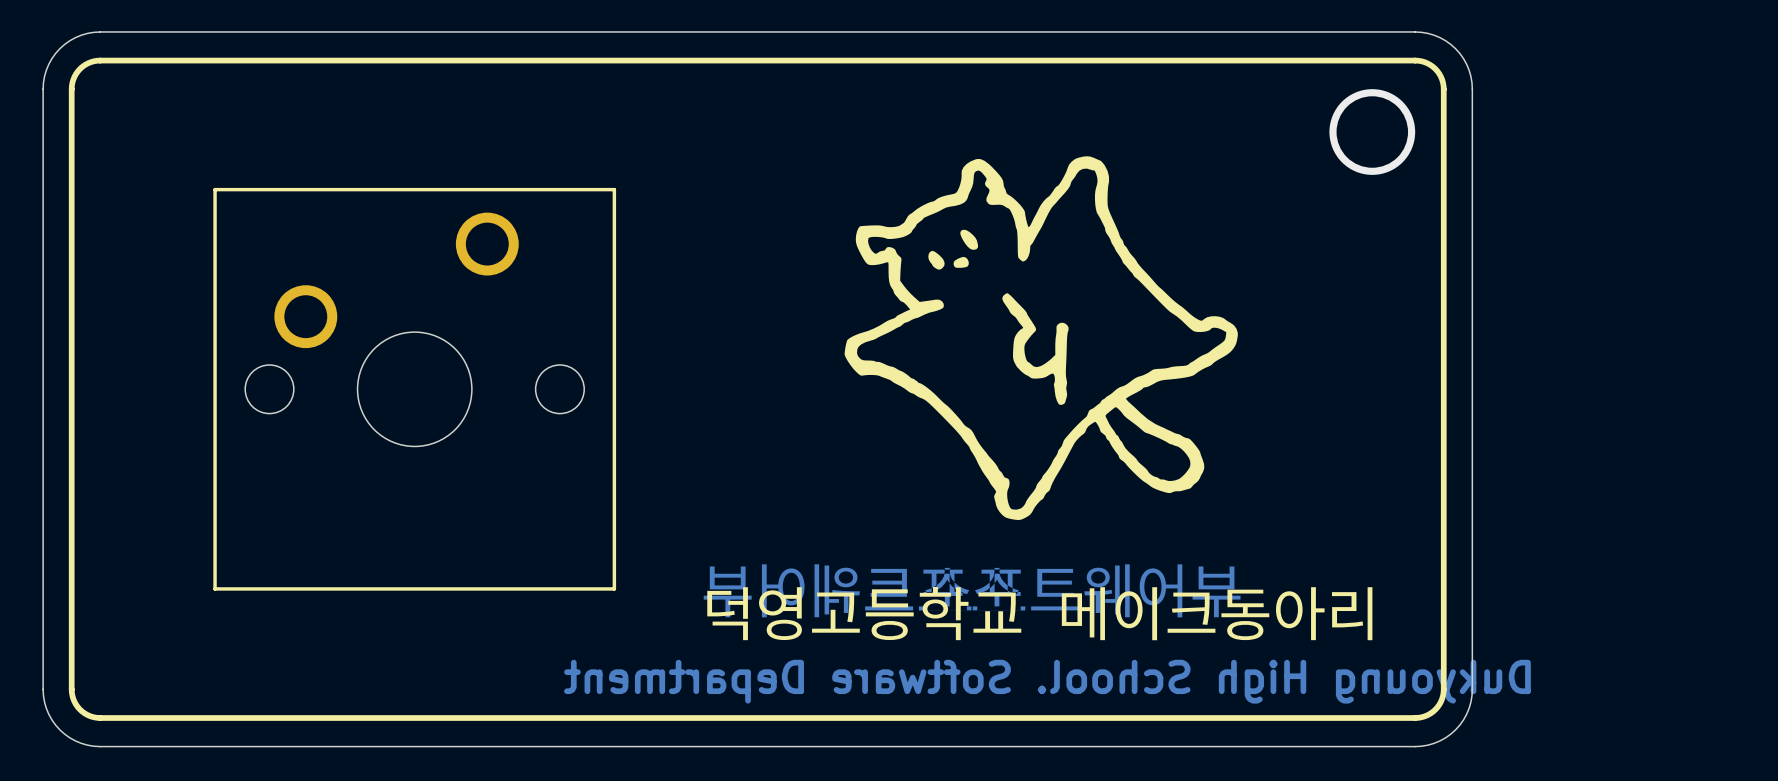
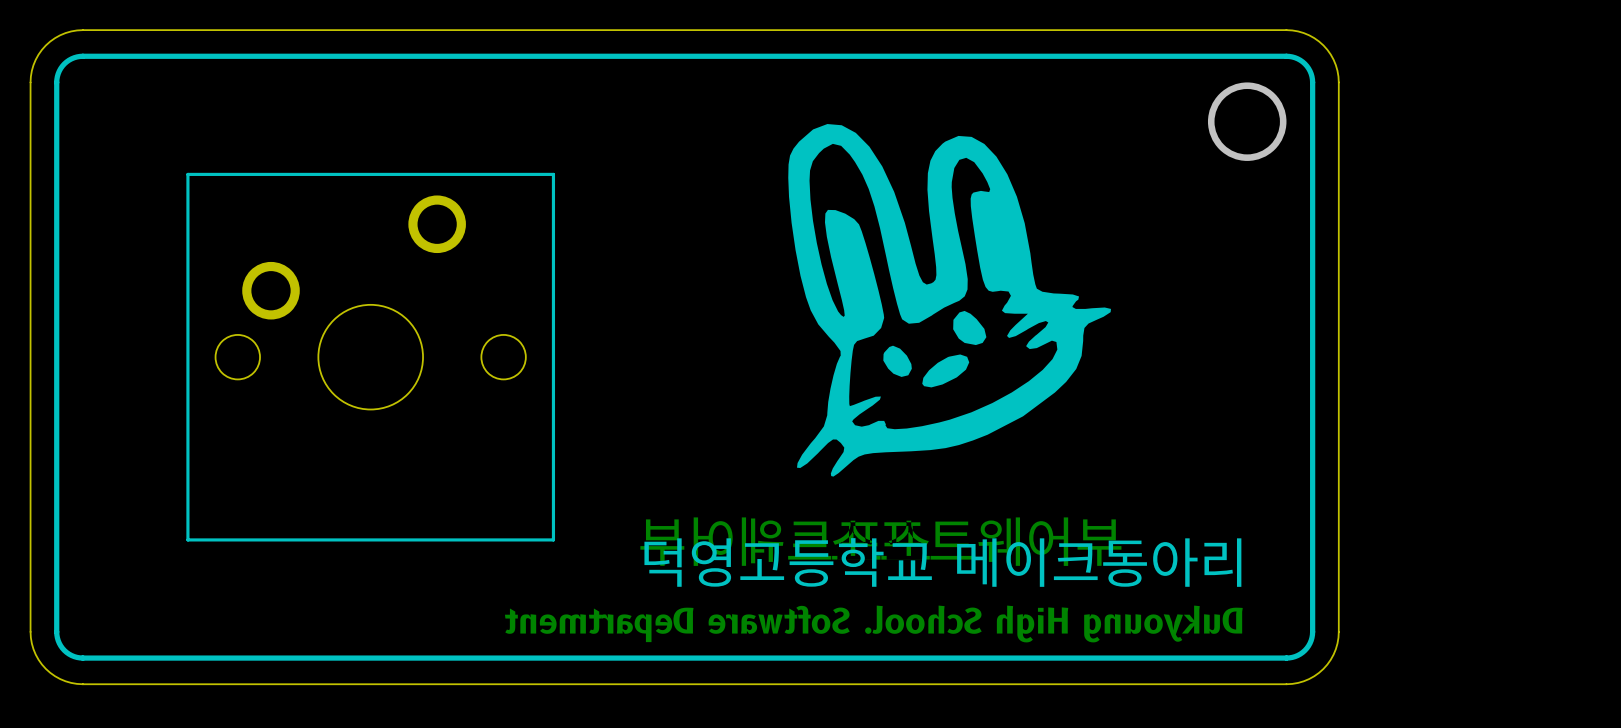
drawing shape: [844, 156, 1238, 521] -> [788, 124, 1111, 477]

